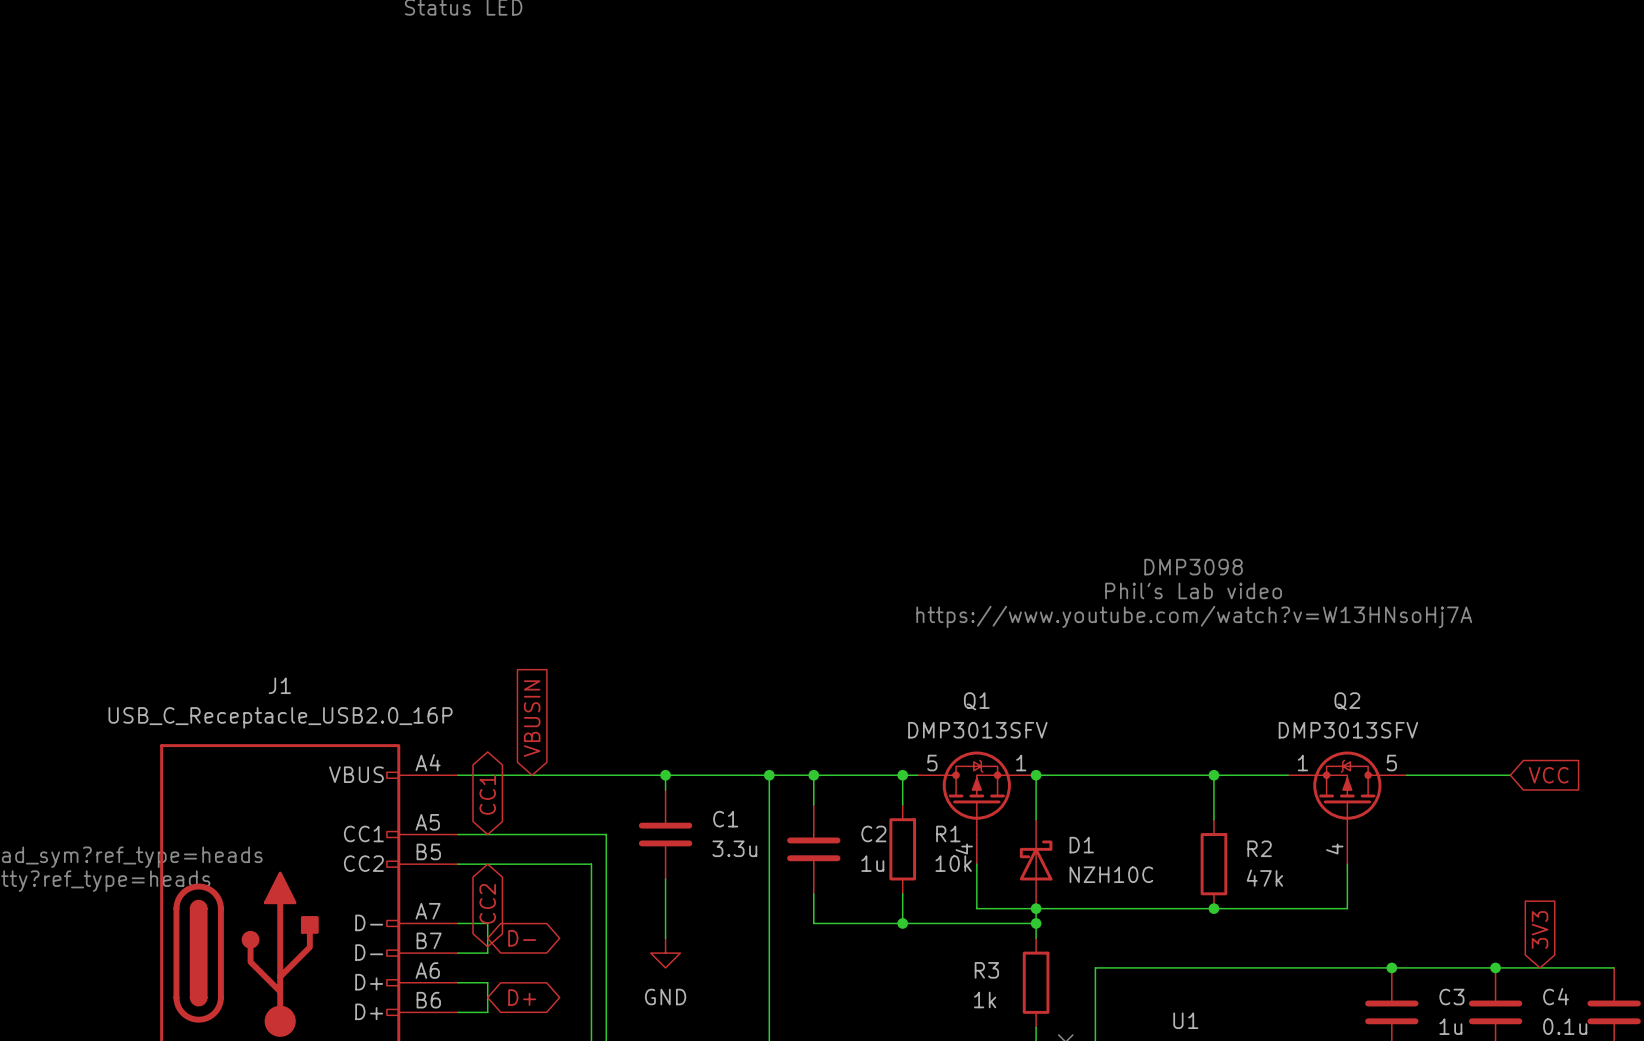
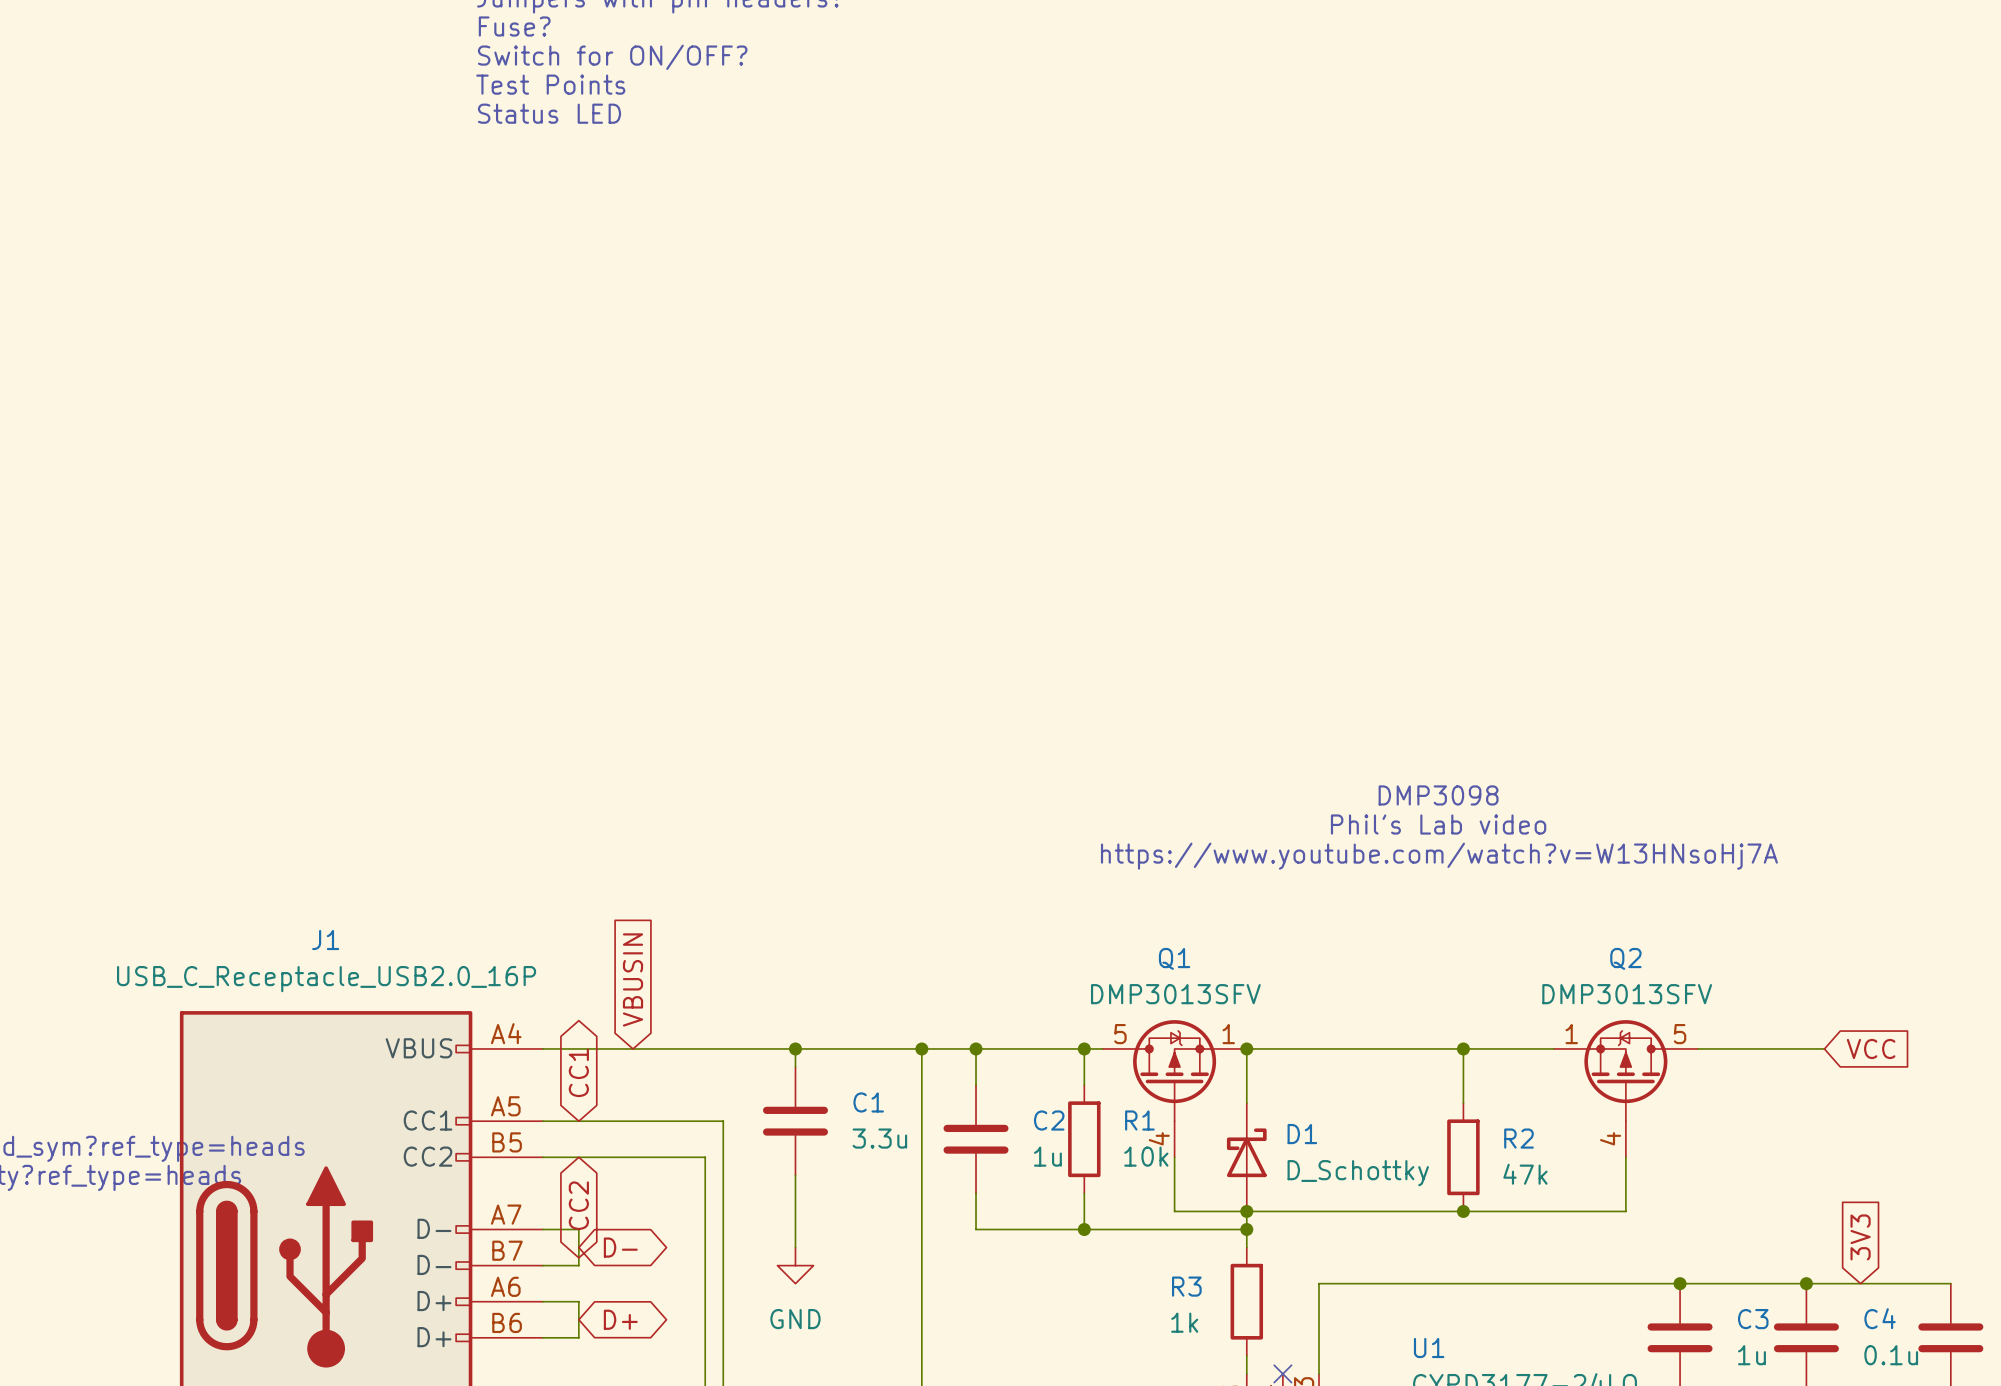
D1 value: NZH10C (1111, 874) -> D_Schottky (1358, 1173)

